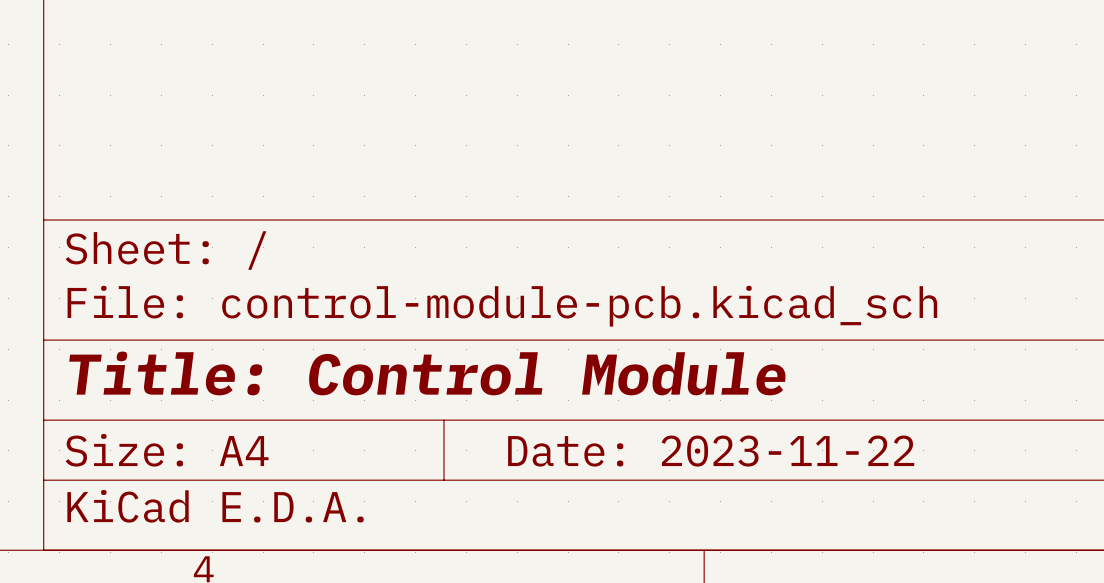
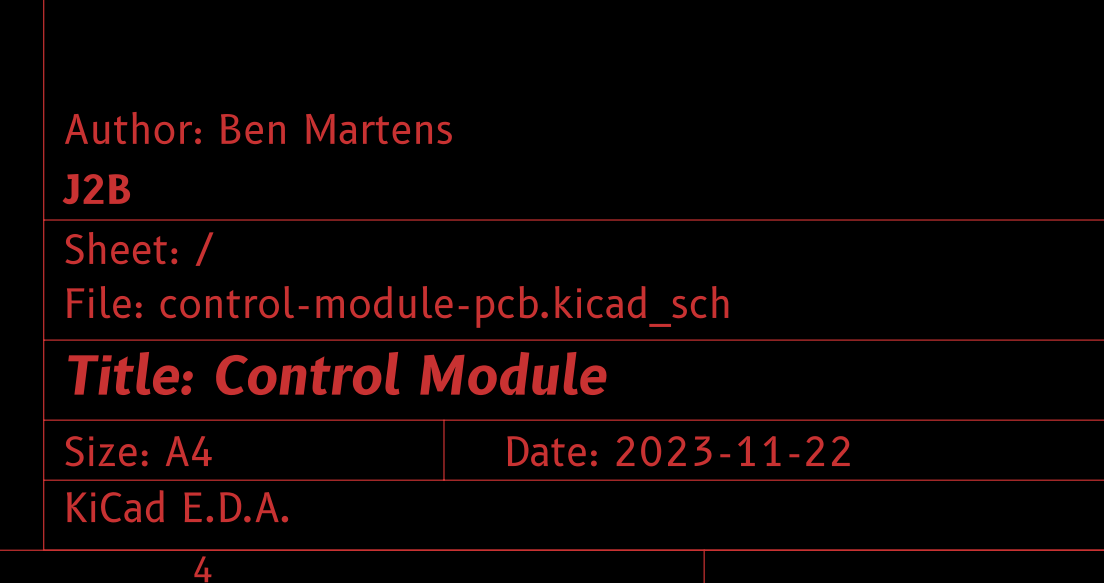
title block: none -> Author: Ben Martens (258, 128)
title block: none -> J2B (96, 189)

